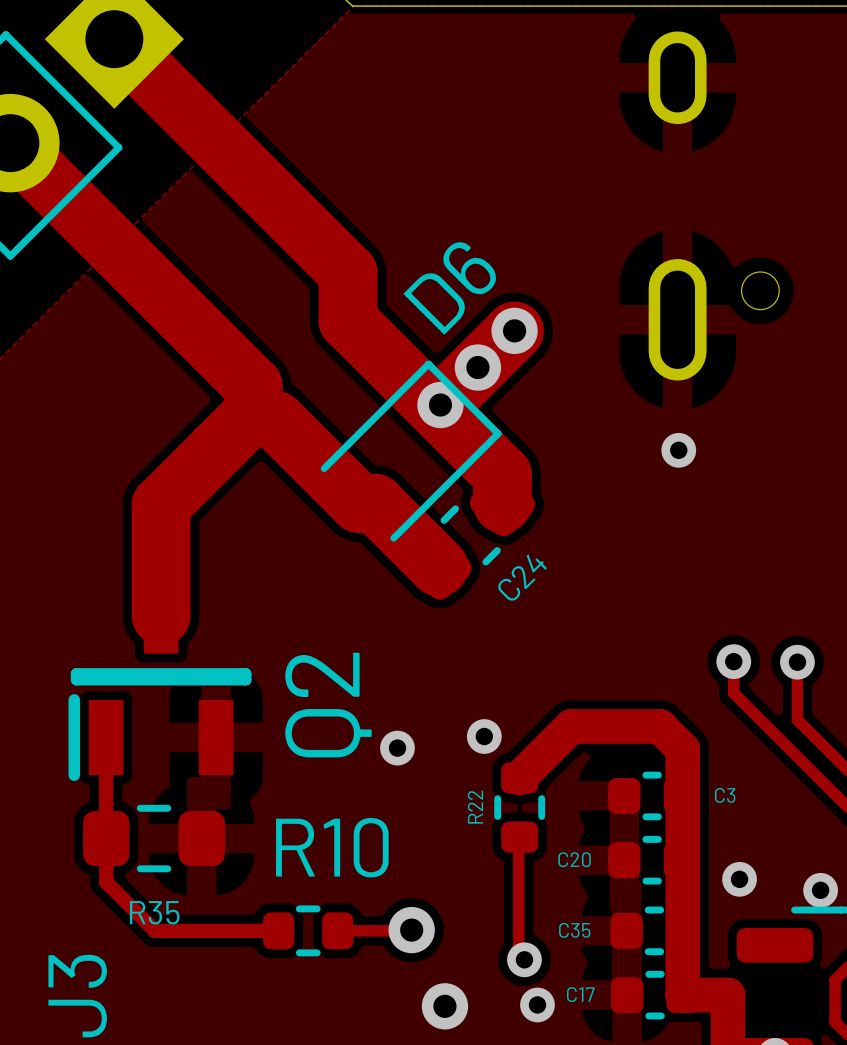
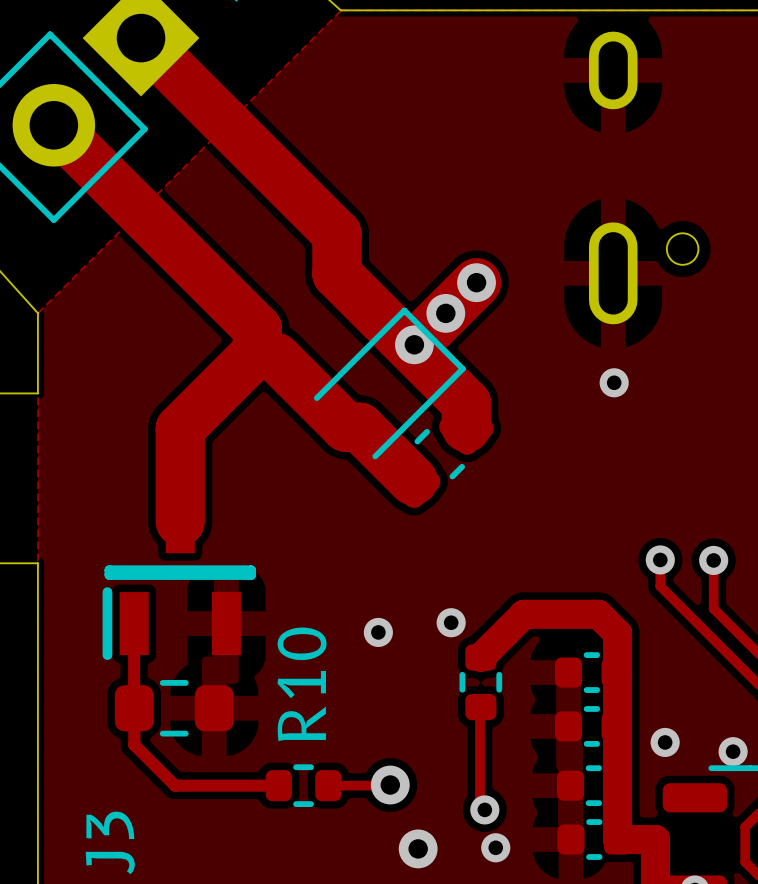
D6 name: D6 (449, 288) -> none
C24 name: C24 (522, 577) -> none
Q2 name: Q2 (328, 705) -> none
C3 name: C3 (725, 795) -> none
R22 name: R22 (475, 807) -> none
R10 name rotation: 0° (332, 847) -> 90° counterclockwise (302, 684)
C20 name: C20 (574, 859) -> none
R35 name: R35 (154, 912) -> none
C35 name: C35 (574, 930) -> none
C17 name: C17 (580, 994) -> none

